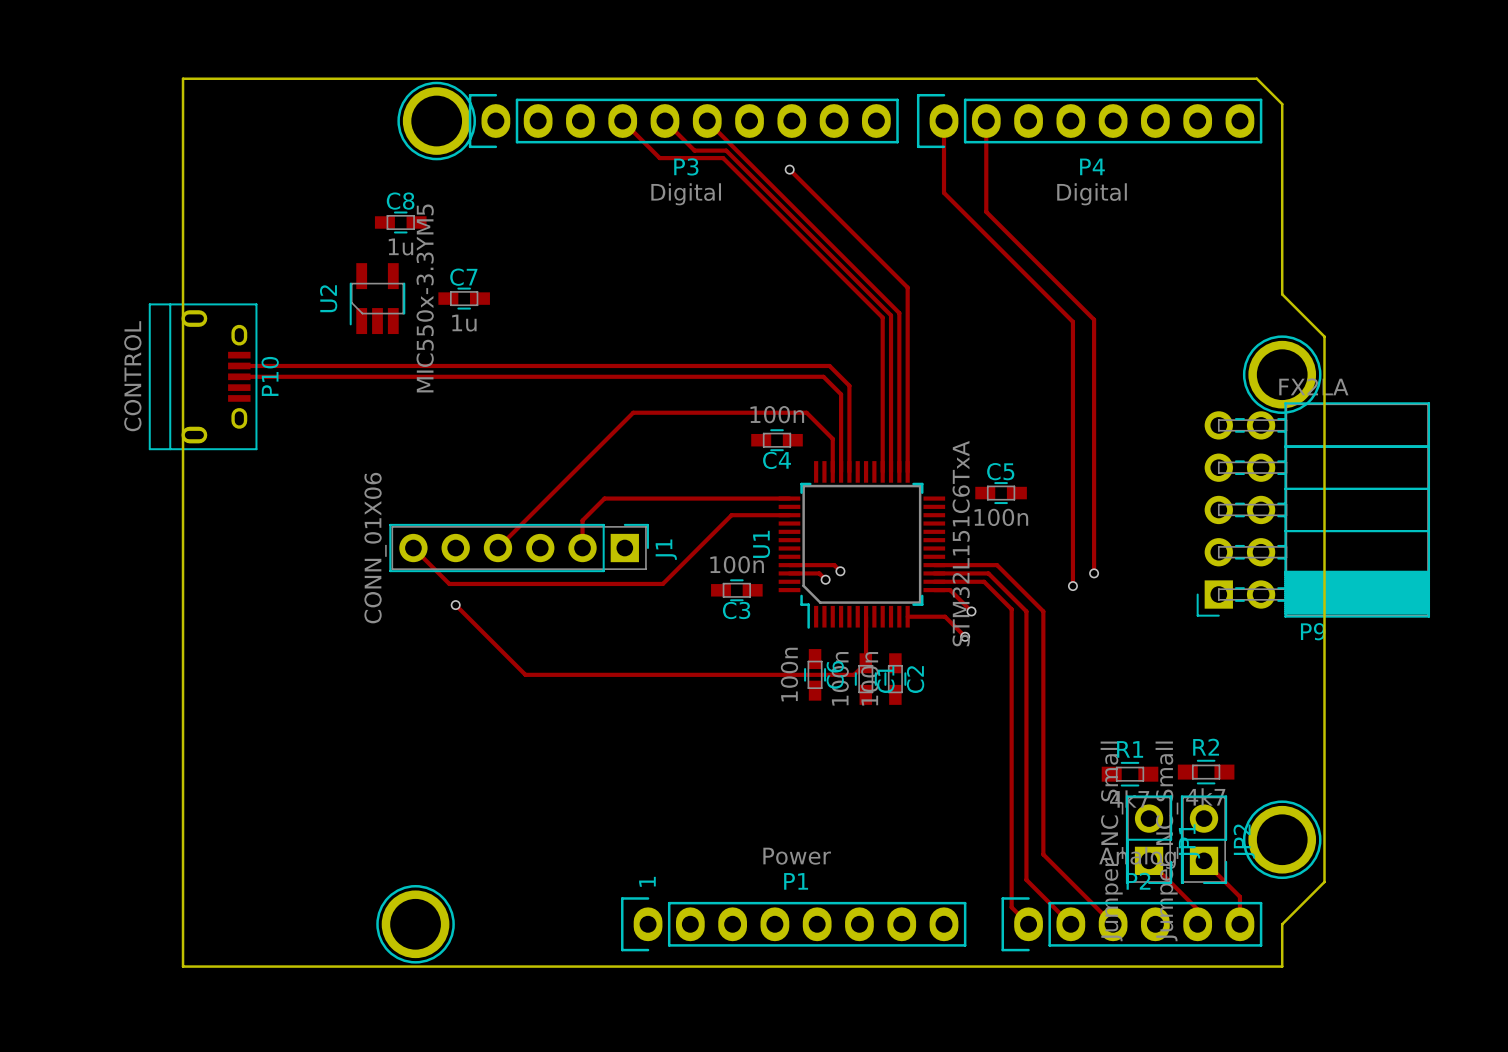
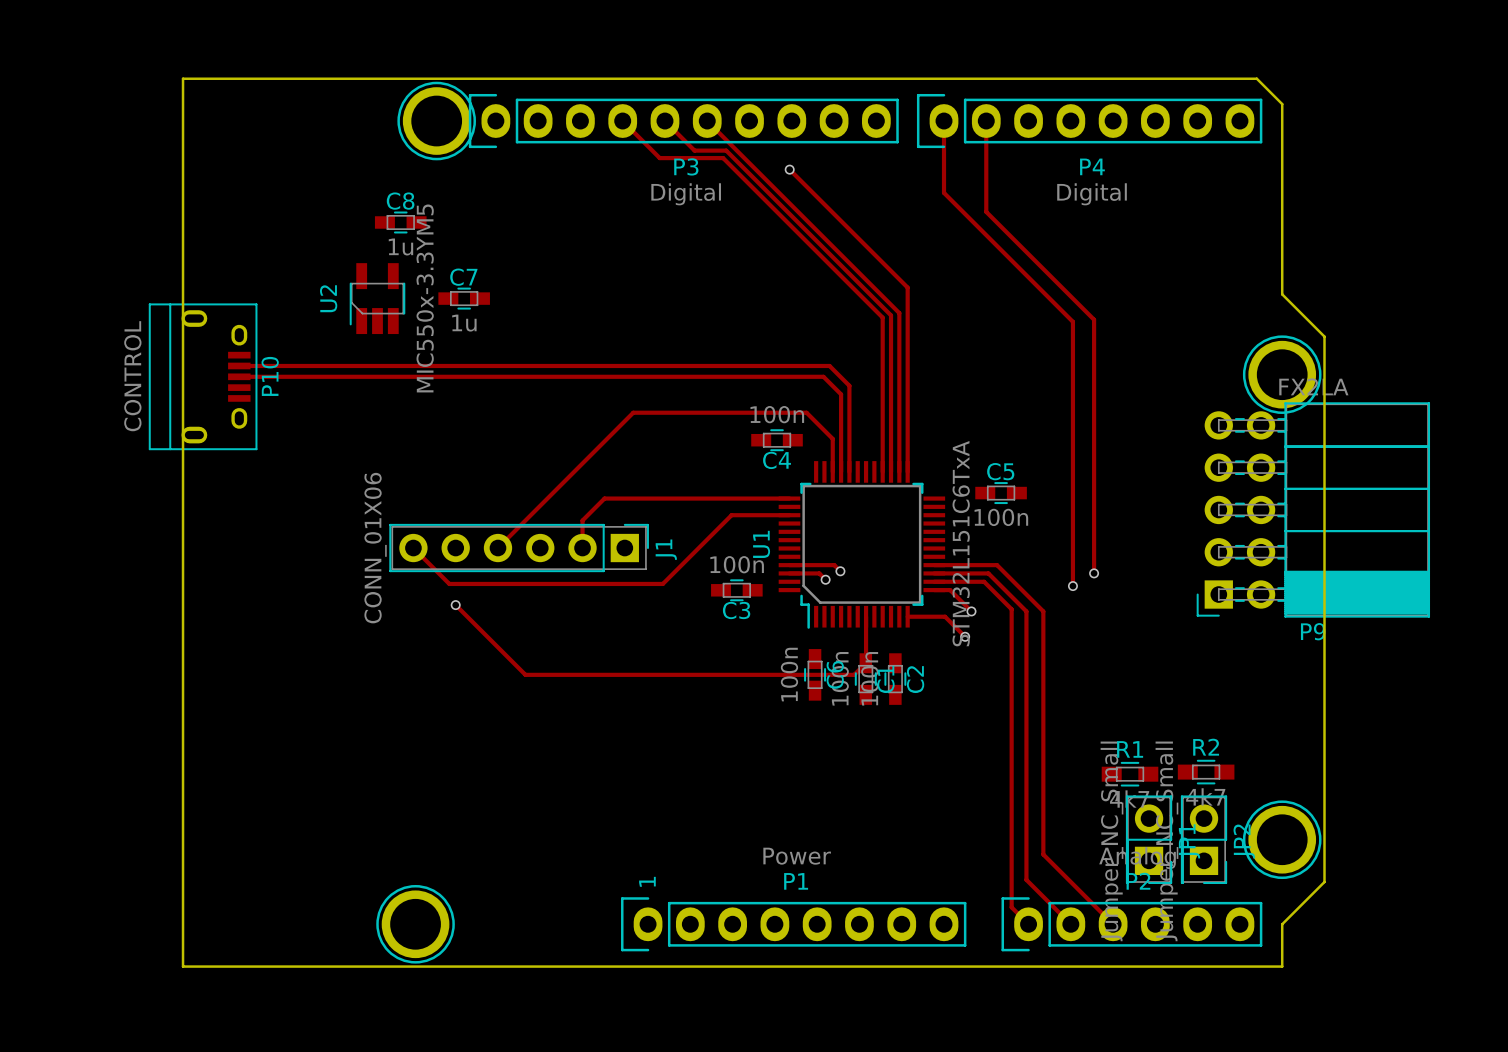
track: (1149, 860) (1197, 909) (1197, 924) -> none
track: (1204, 860) (1239, 896) (1239, 924) -> none

